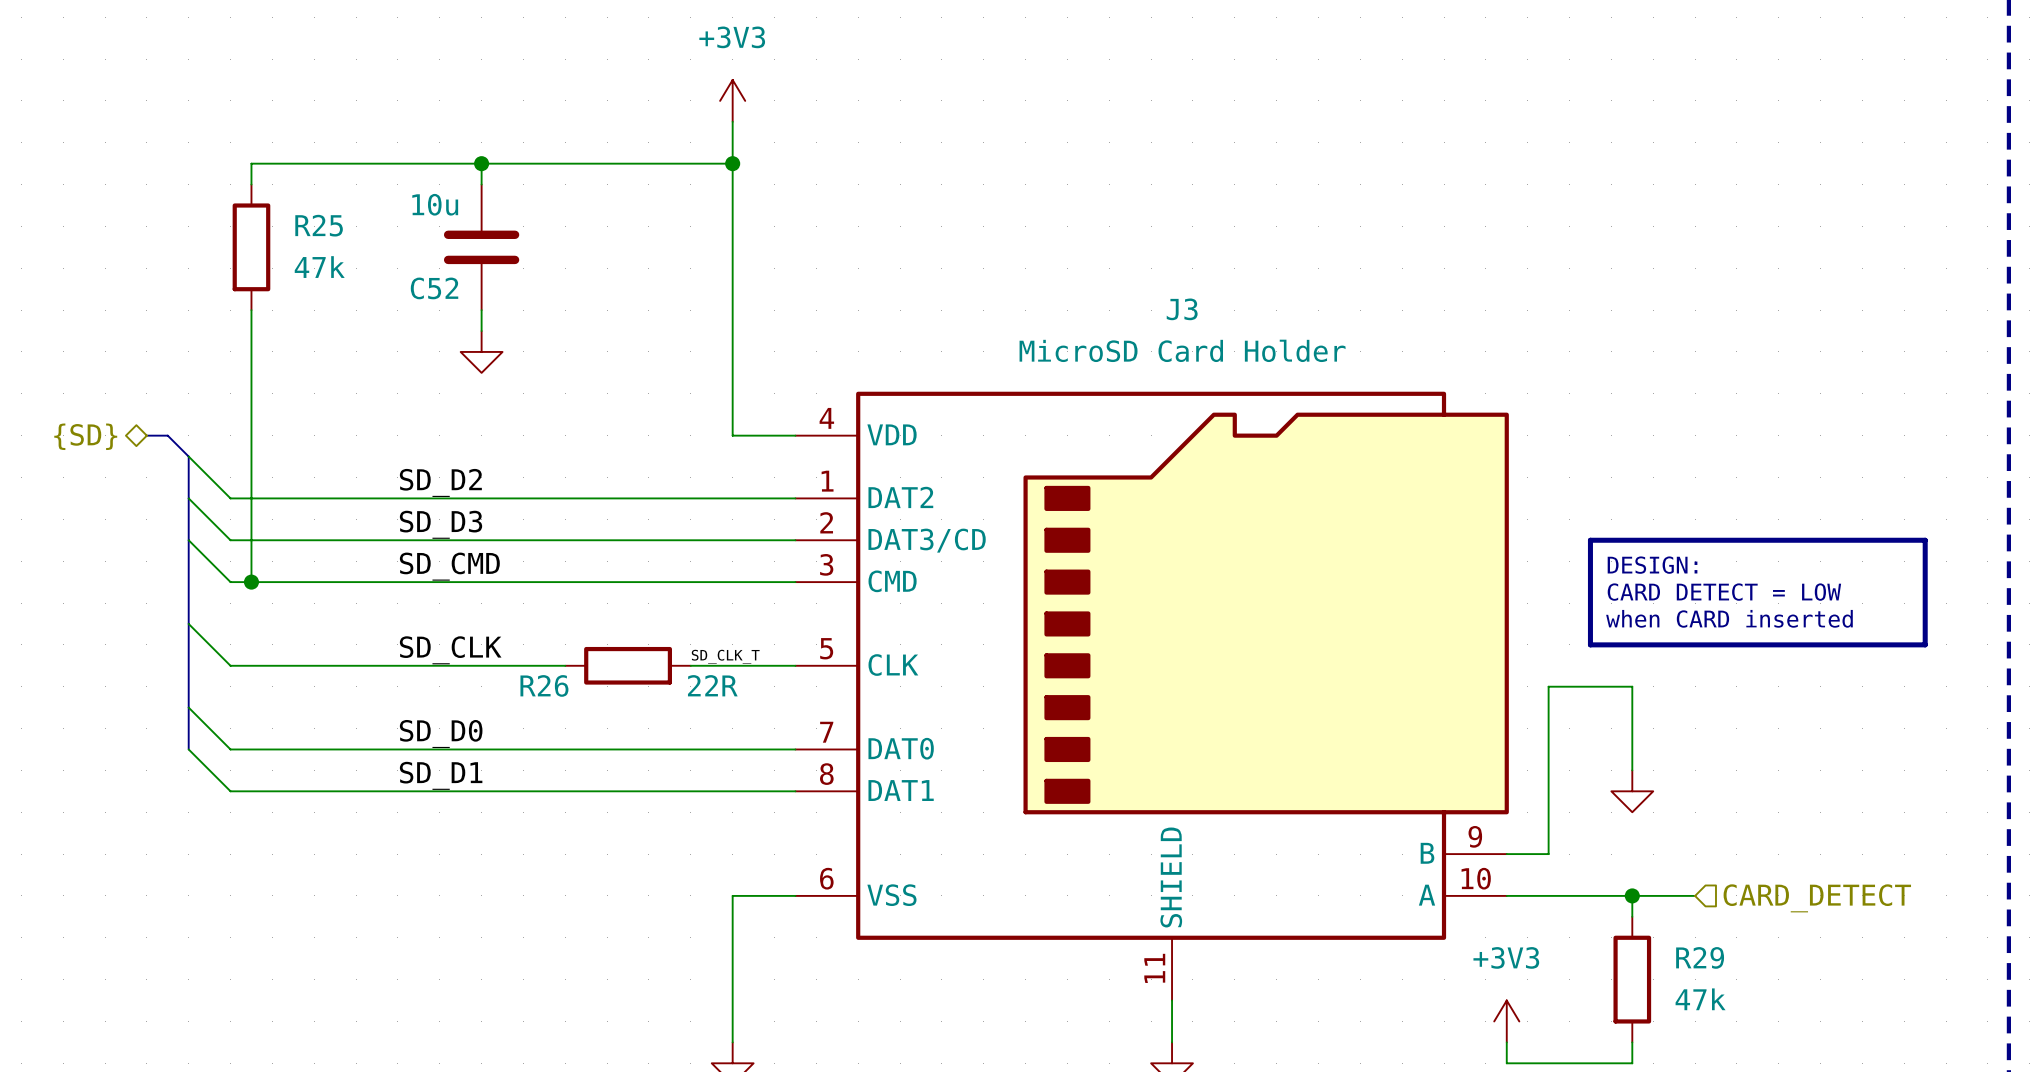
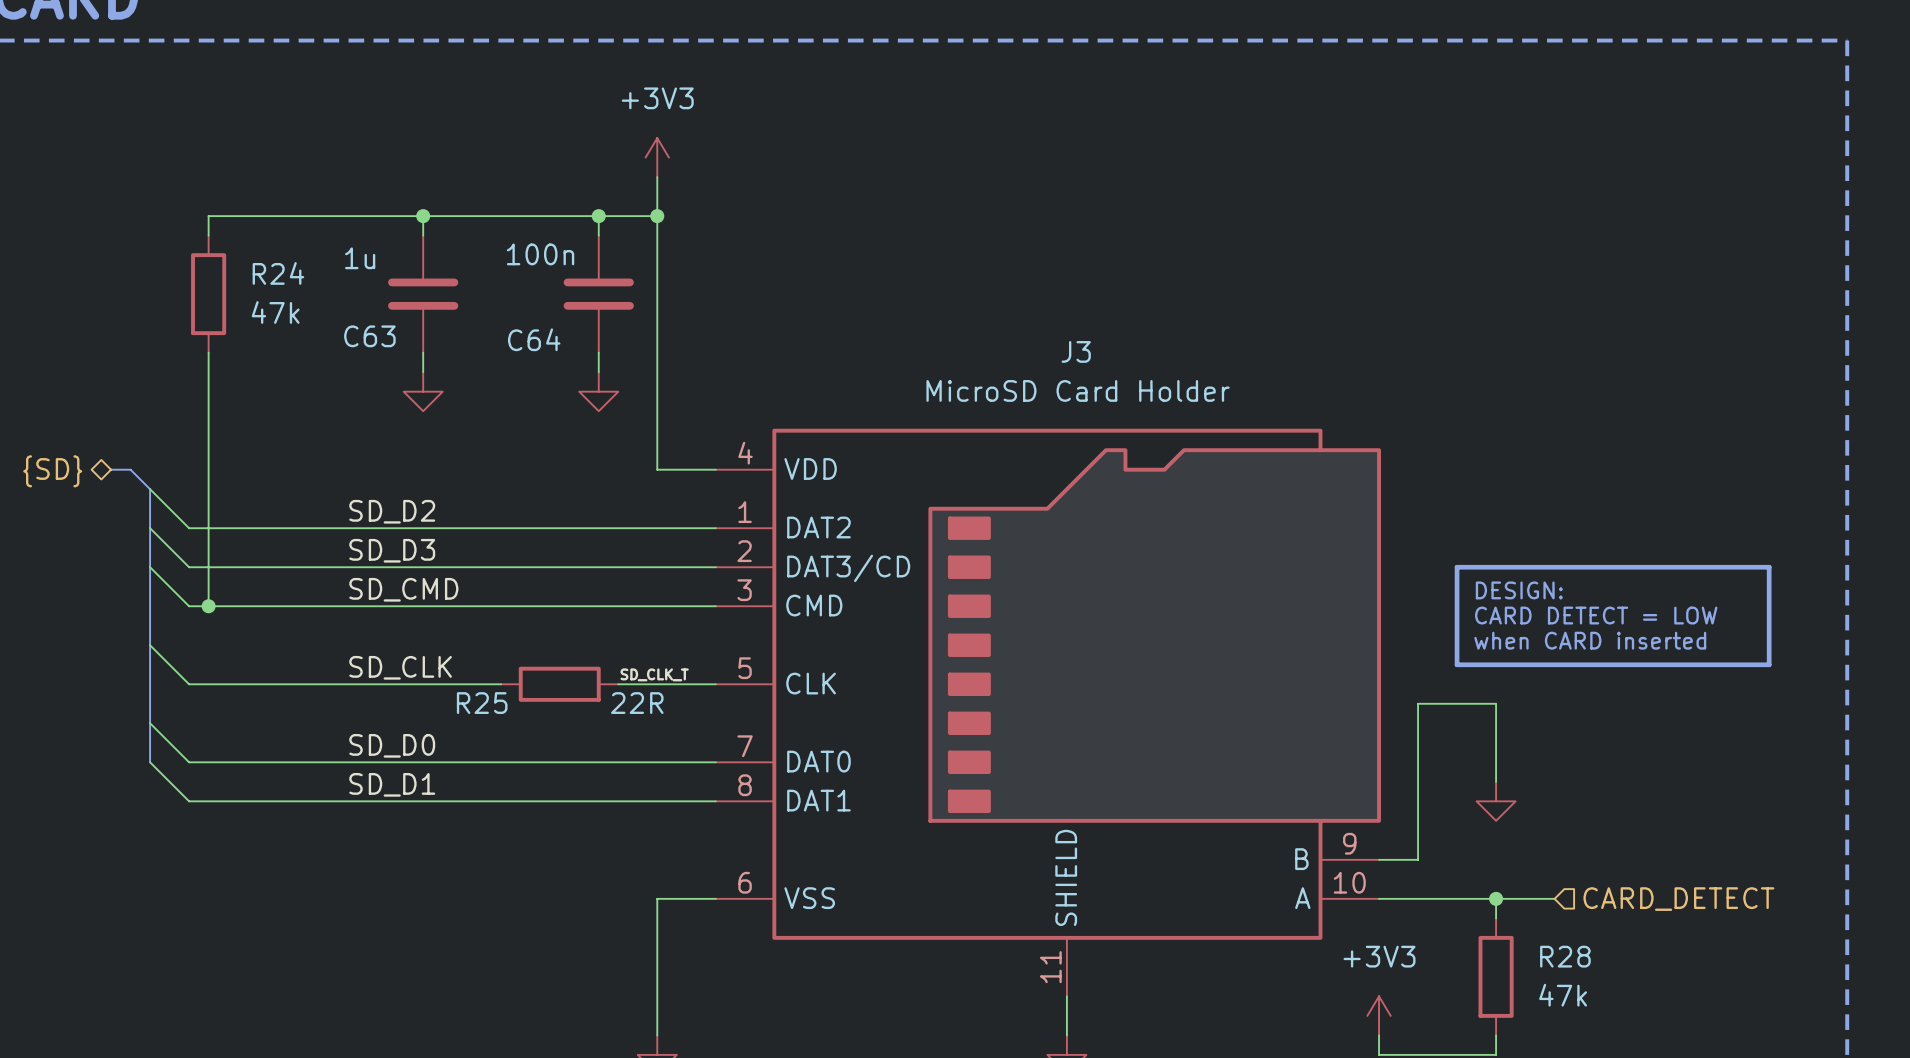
wire: none -> (598, 216) (598, 235)
junction: none -> (598, 216)
C52 value: 10u (435, 204) -> 1u (360, 258)
R25 name: R25 (319, 225) -> R24 (278, 273)
C64: none -> 100n (598, 294)
C52 name: C52 (434, 288) -> C63 (369, 336)
wire: none -> (598, 352) (598, 372)
power symbol: none -> (598, 391)
R26 name: R26 (544, 685) -> R25 (482, 703)
R29 name: R29 (1700, 957) -> R28 (1565, 956)

